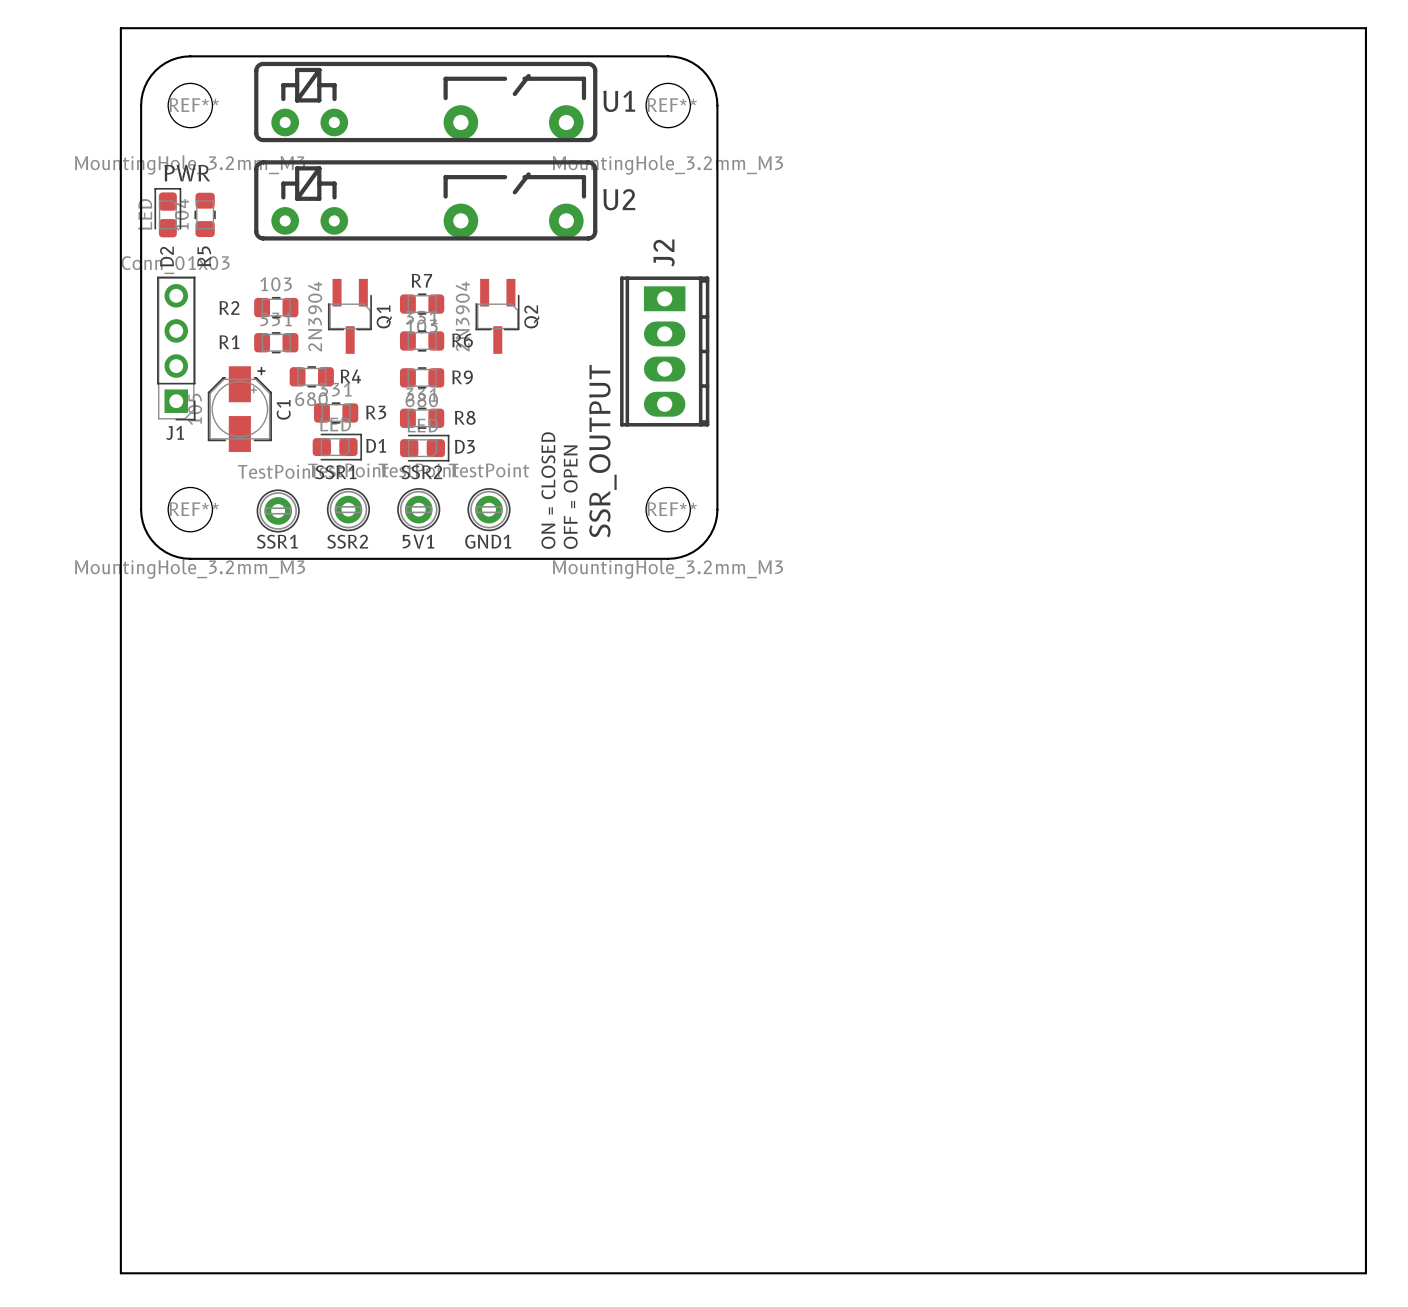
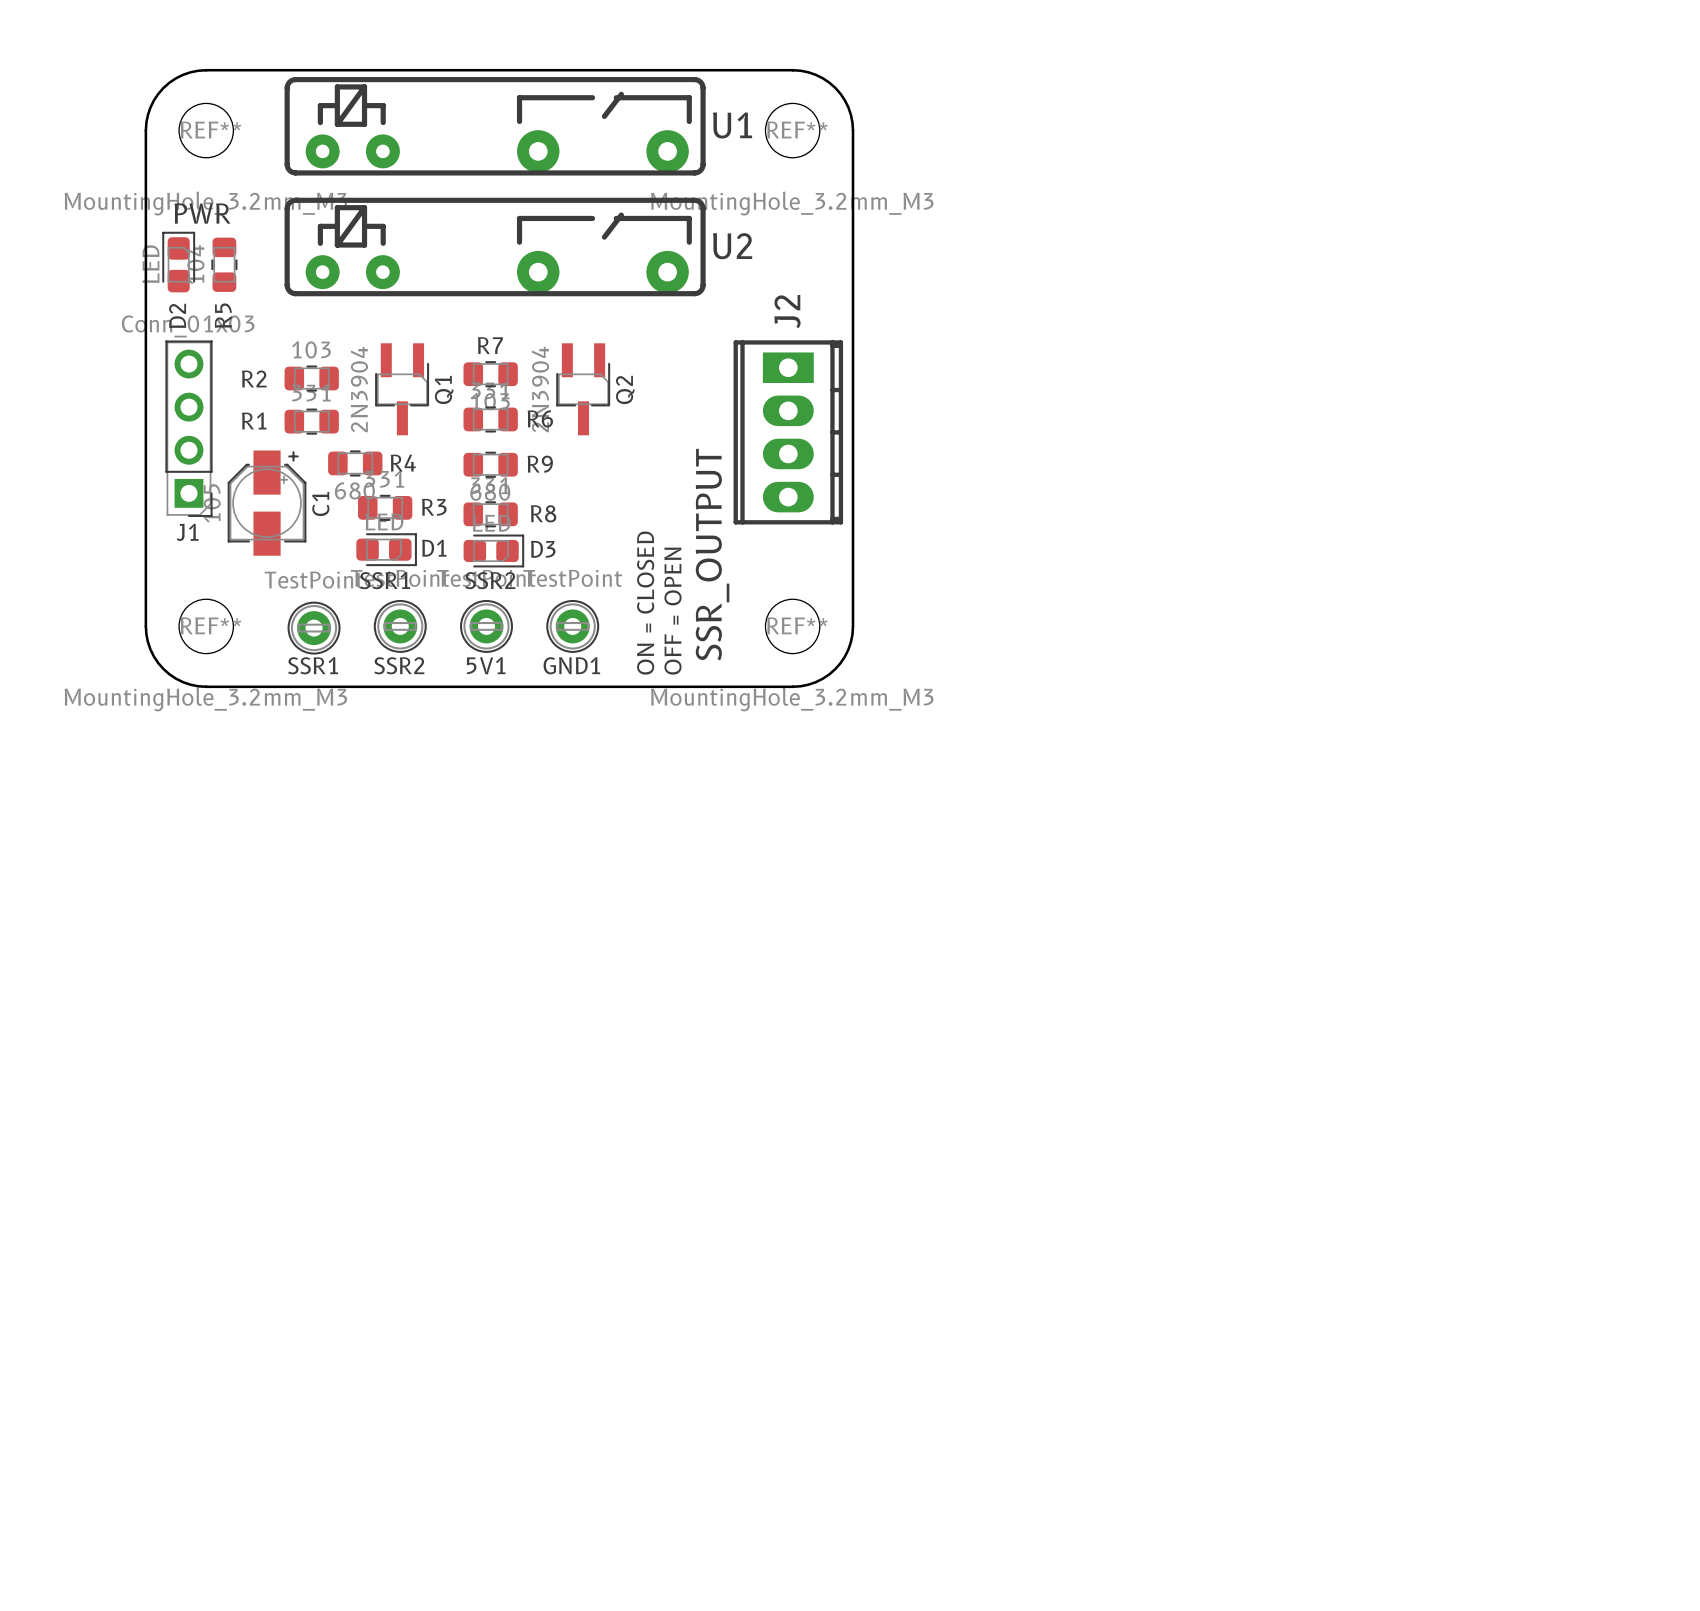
board edge: (120, 28) (120, 1273) (1365, 1273) (1365, 28) (120, 28) -> none

